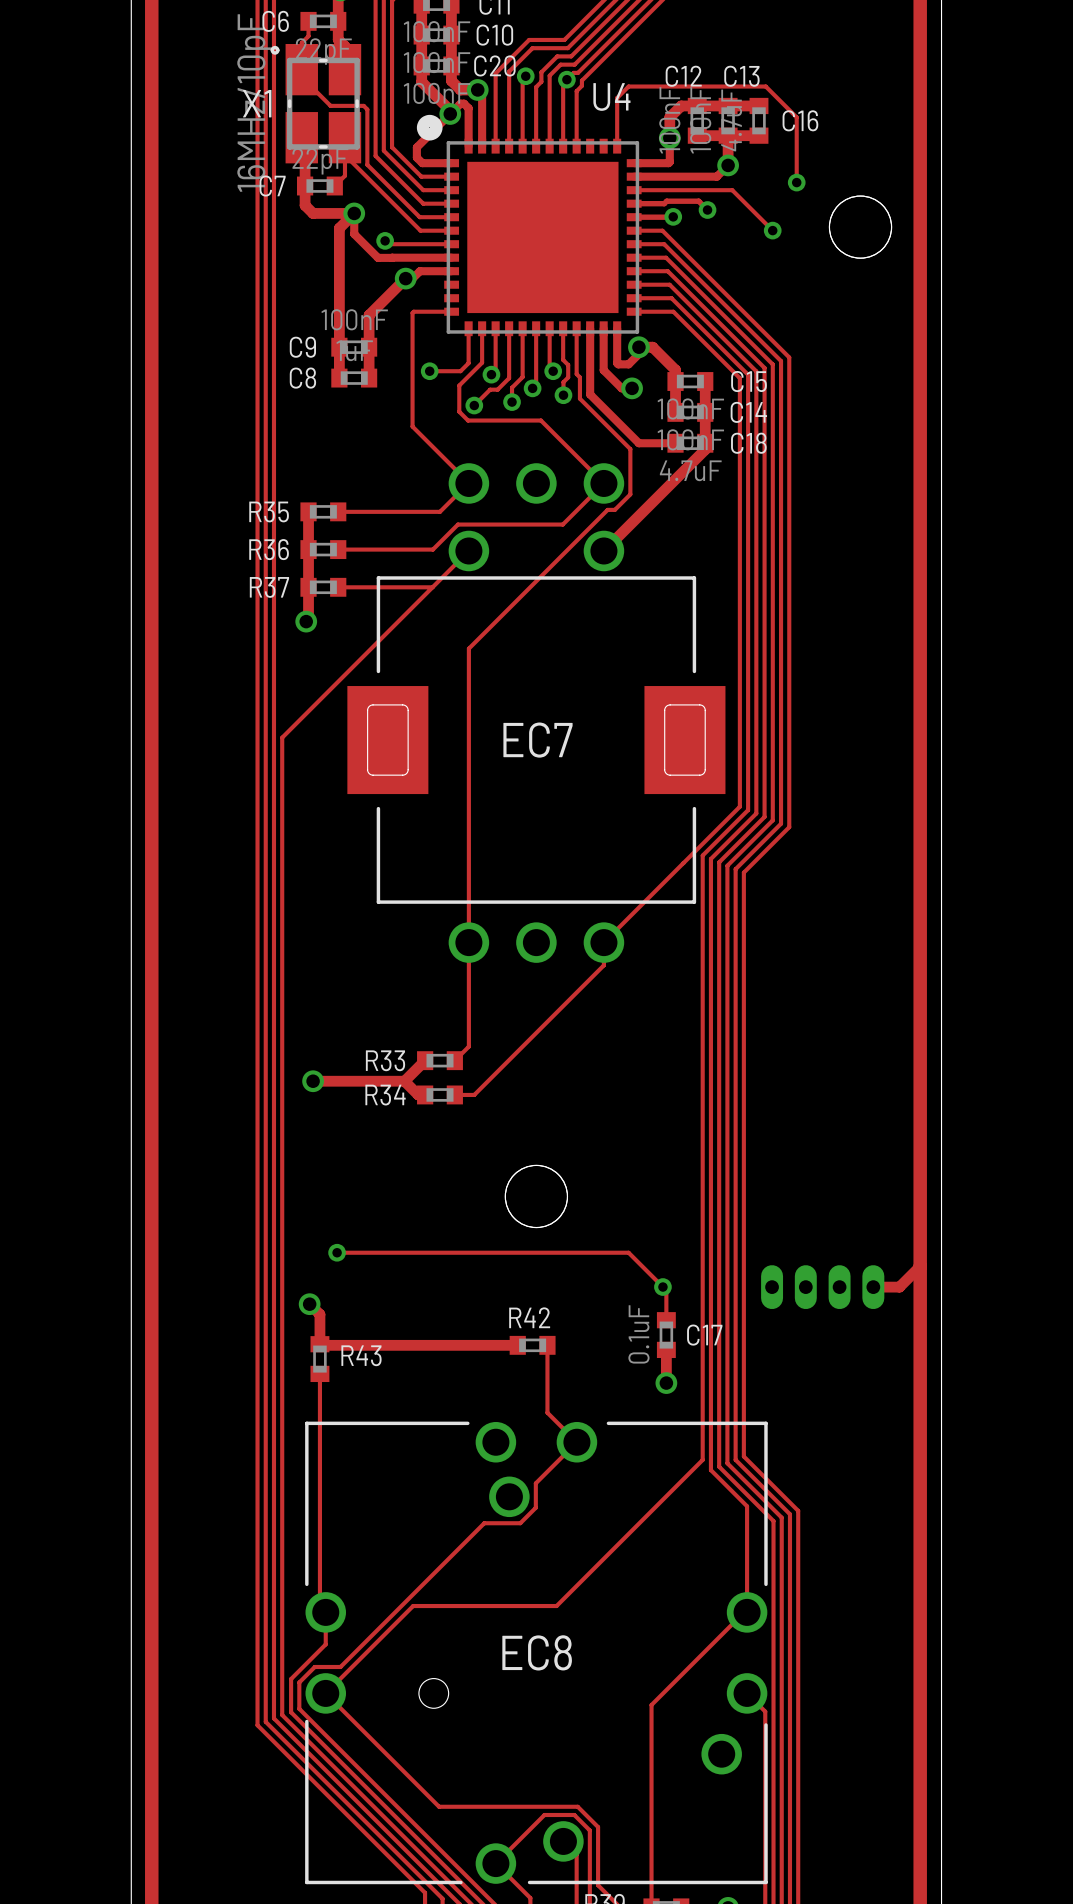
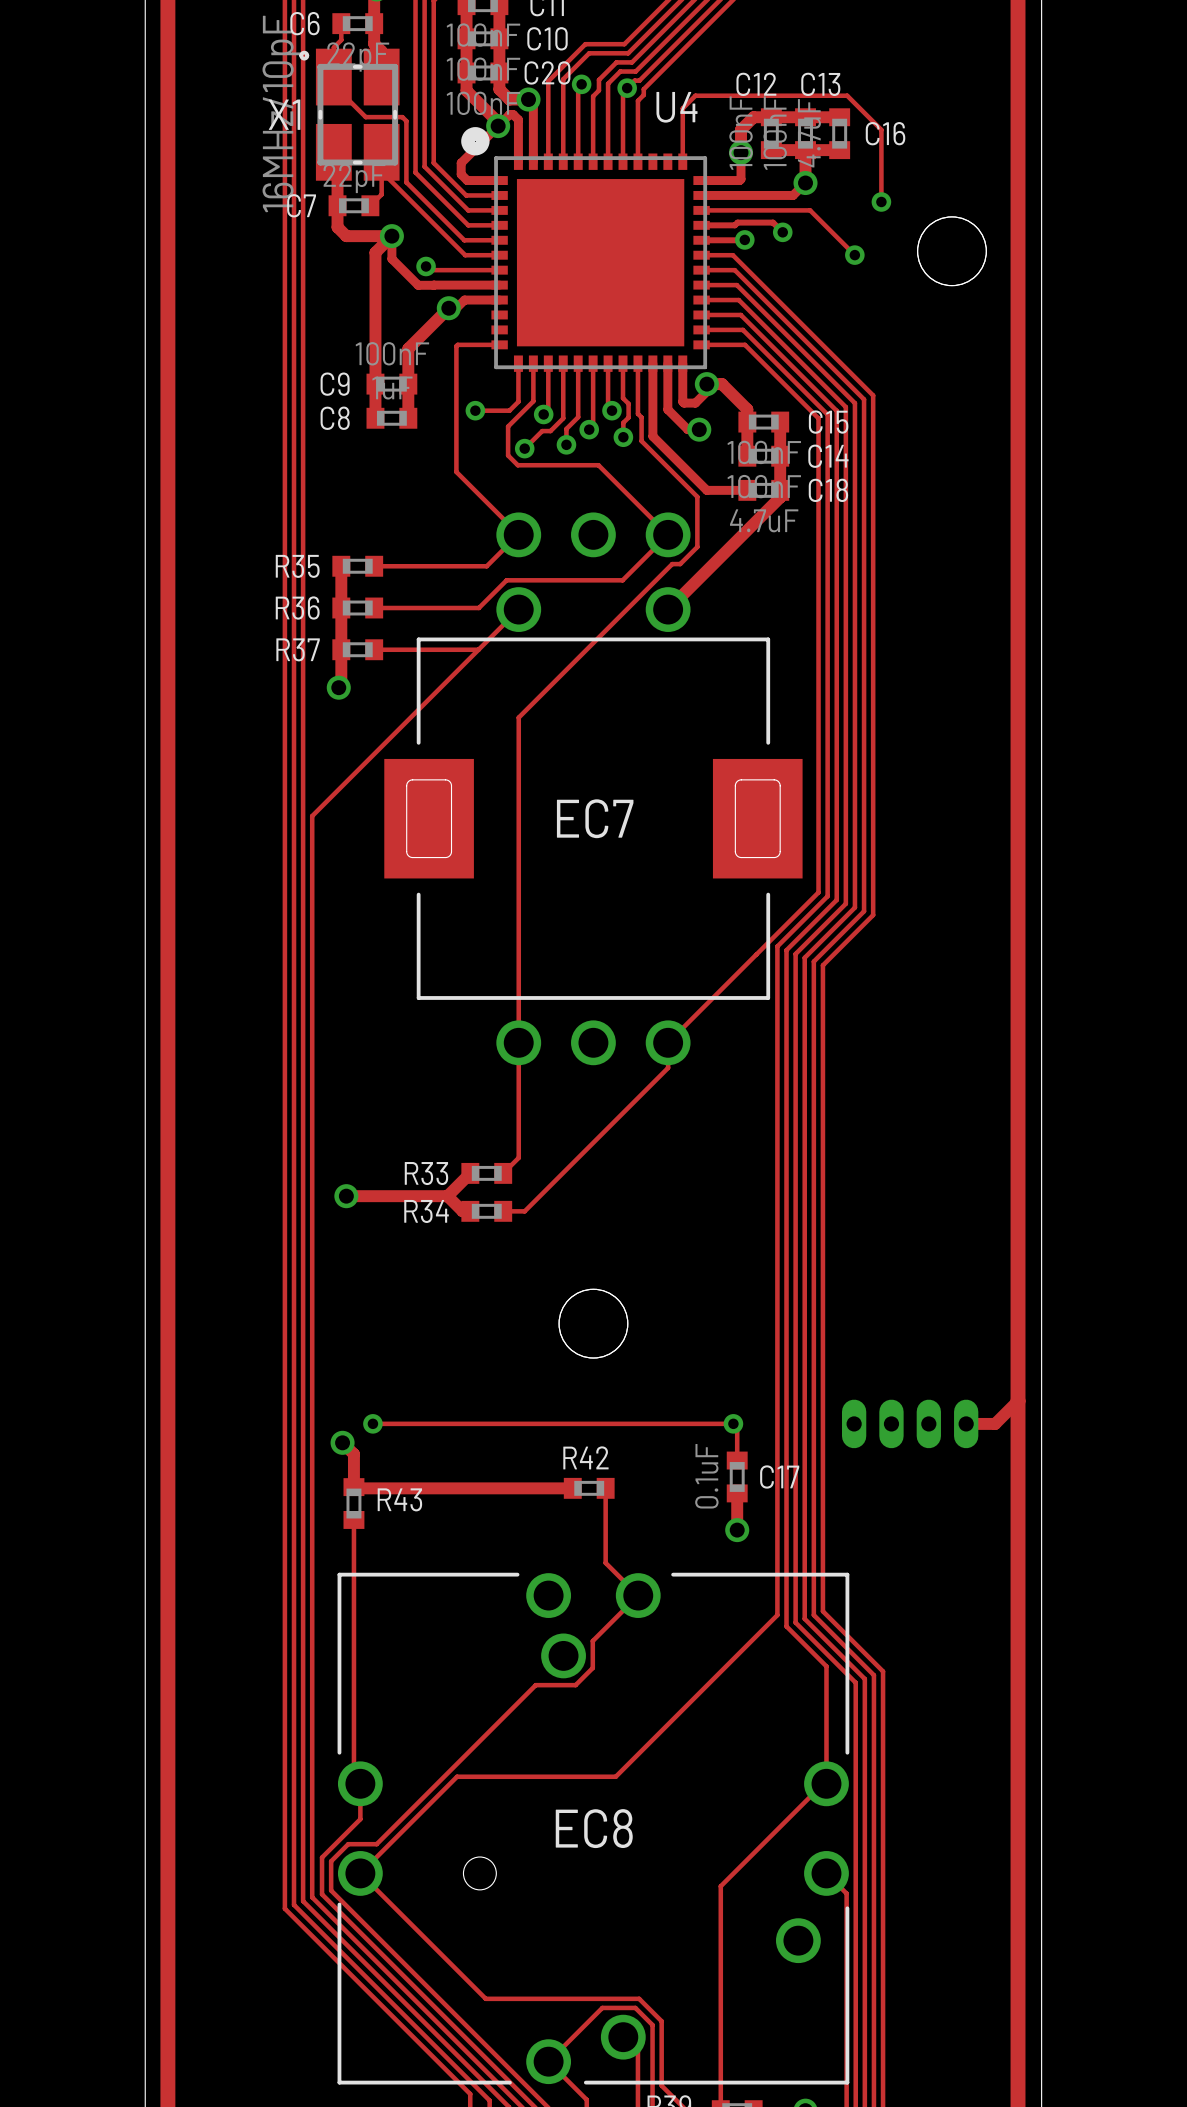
track: (337, 1252) (628, 1252) (662, 1287) -> (372, 1423) (733, 1423)
via position: (337, 1252) -> (372, 1423)

